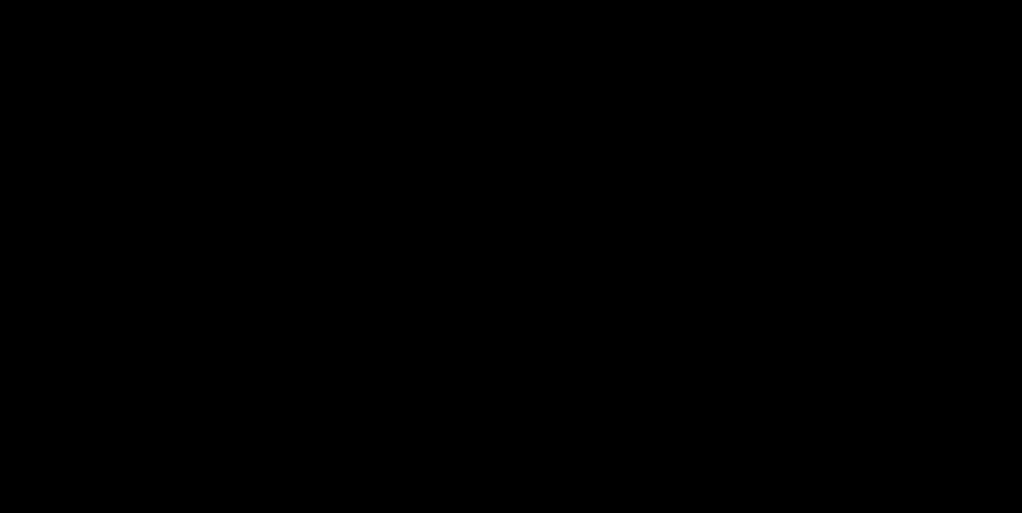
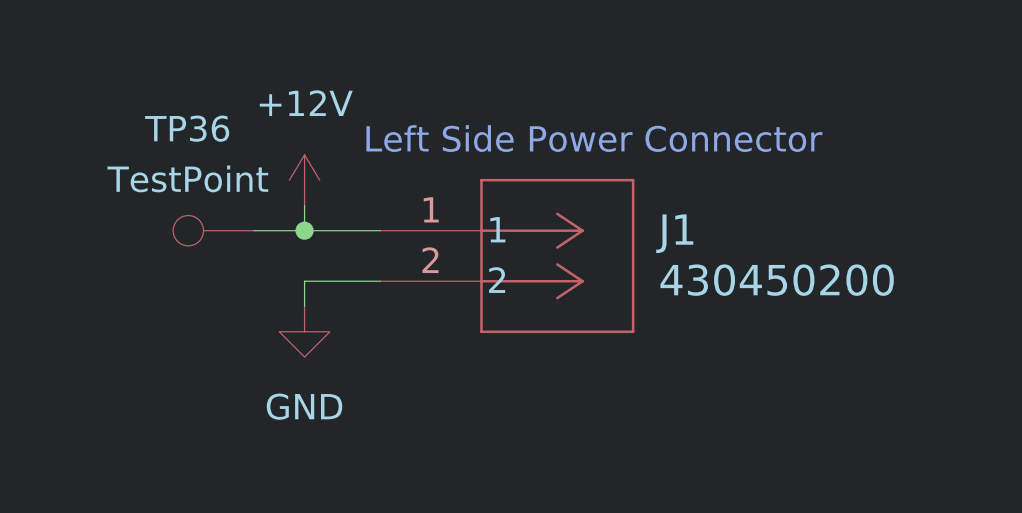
text: none -> Left Side Power Connector (594, 138)
power symbol: none -> +12V (304, 180)
wire: none -> (304, 205) (304, 230)
TP36: none -> TestPoint (213, 230)
wire: none -> (254, 230) (380, 230)
junction: none -> (304, 230)
J1: none -> 430450200 (507, 255)
wire: none -> (380, 281) (304, 281) (304, 306)
power symbol: none -> GND (304, 331)

